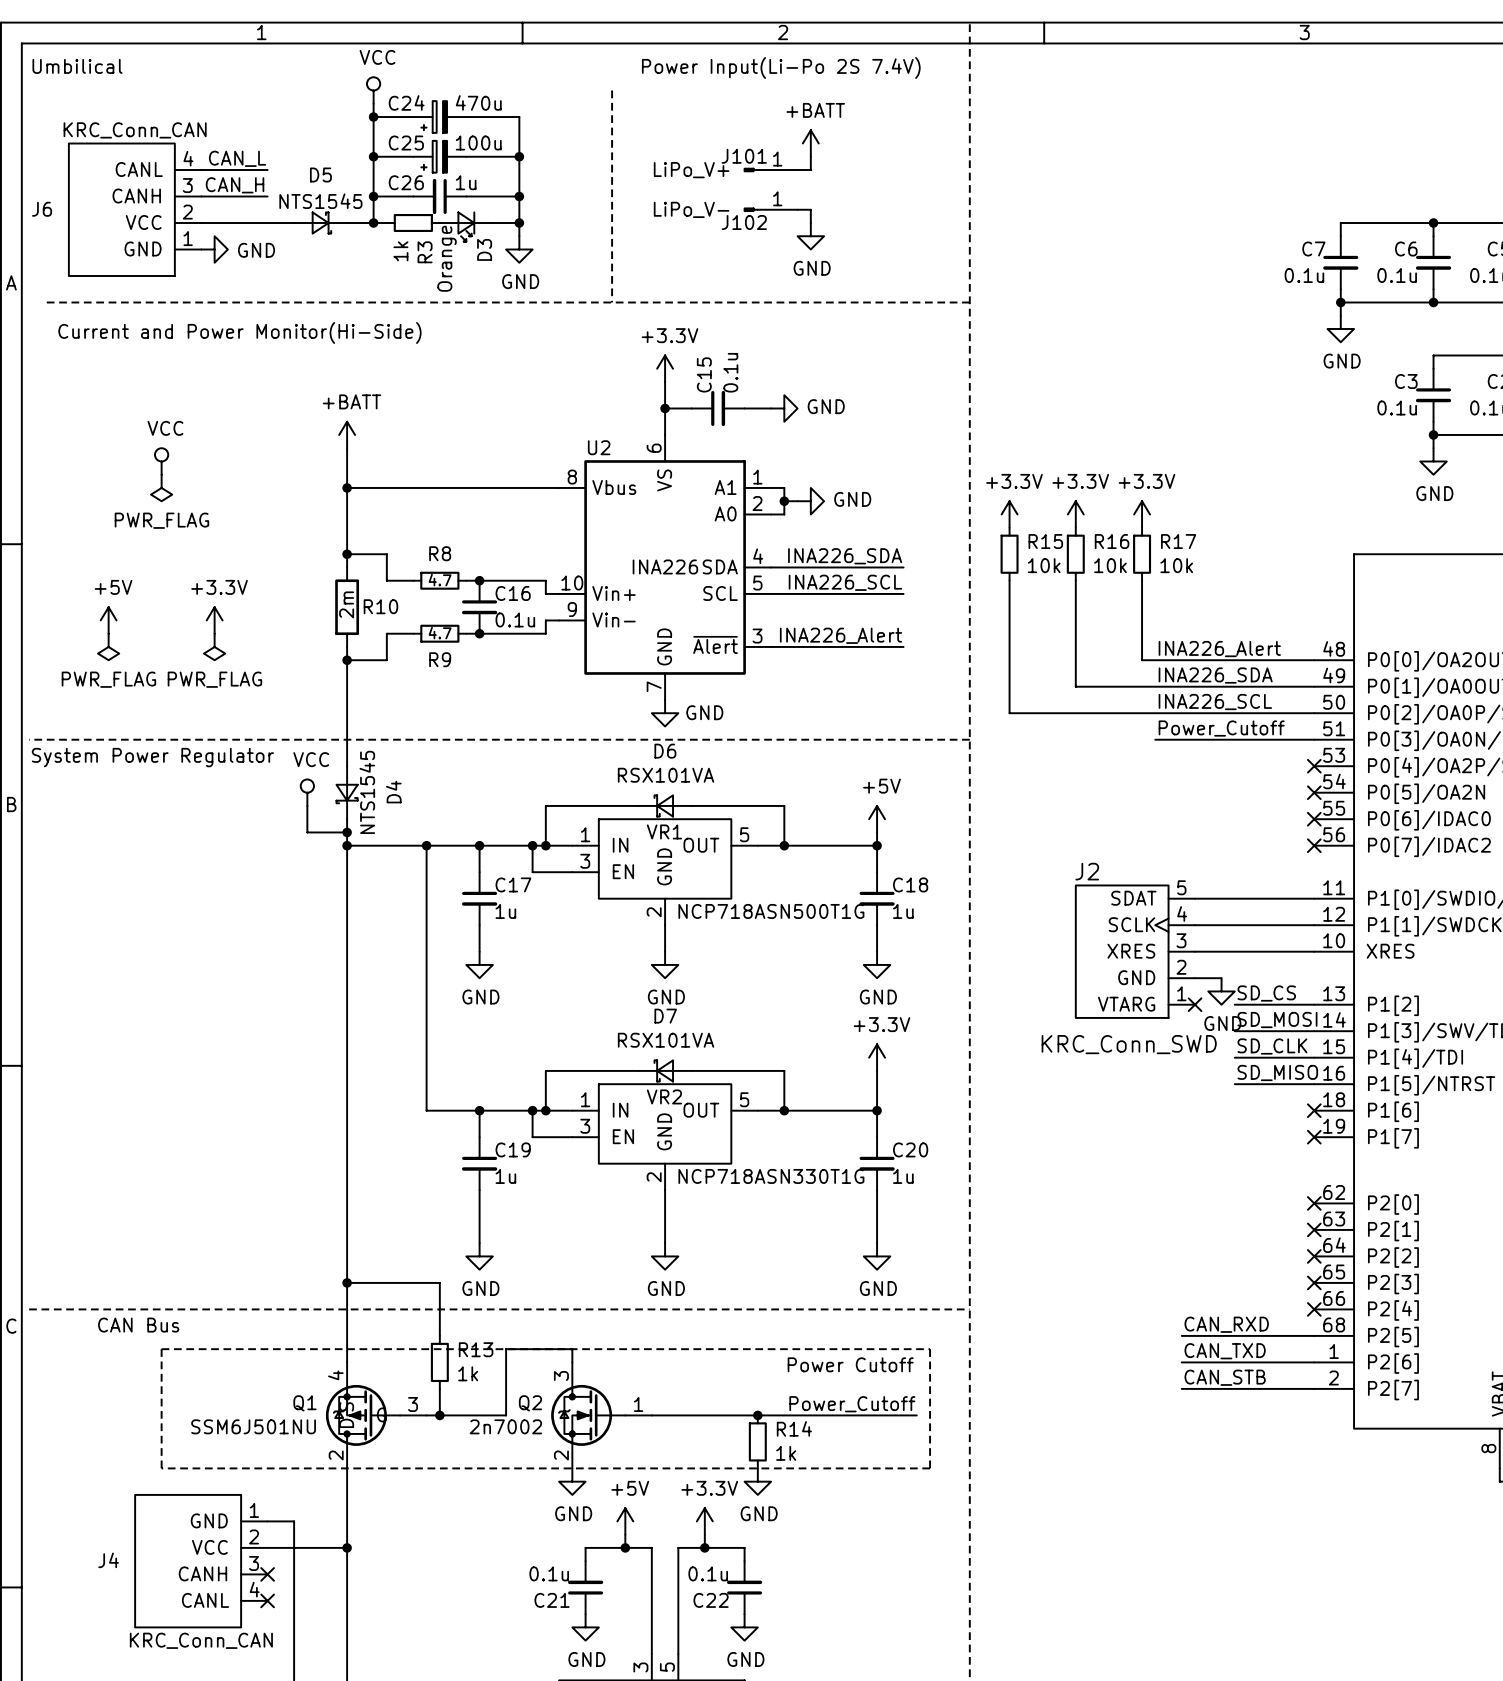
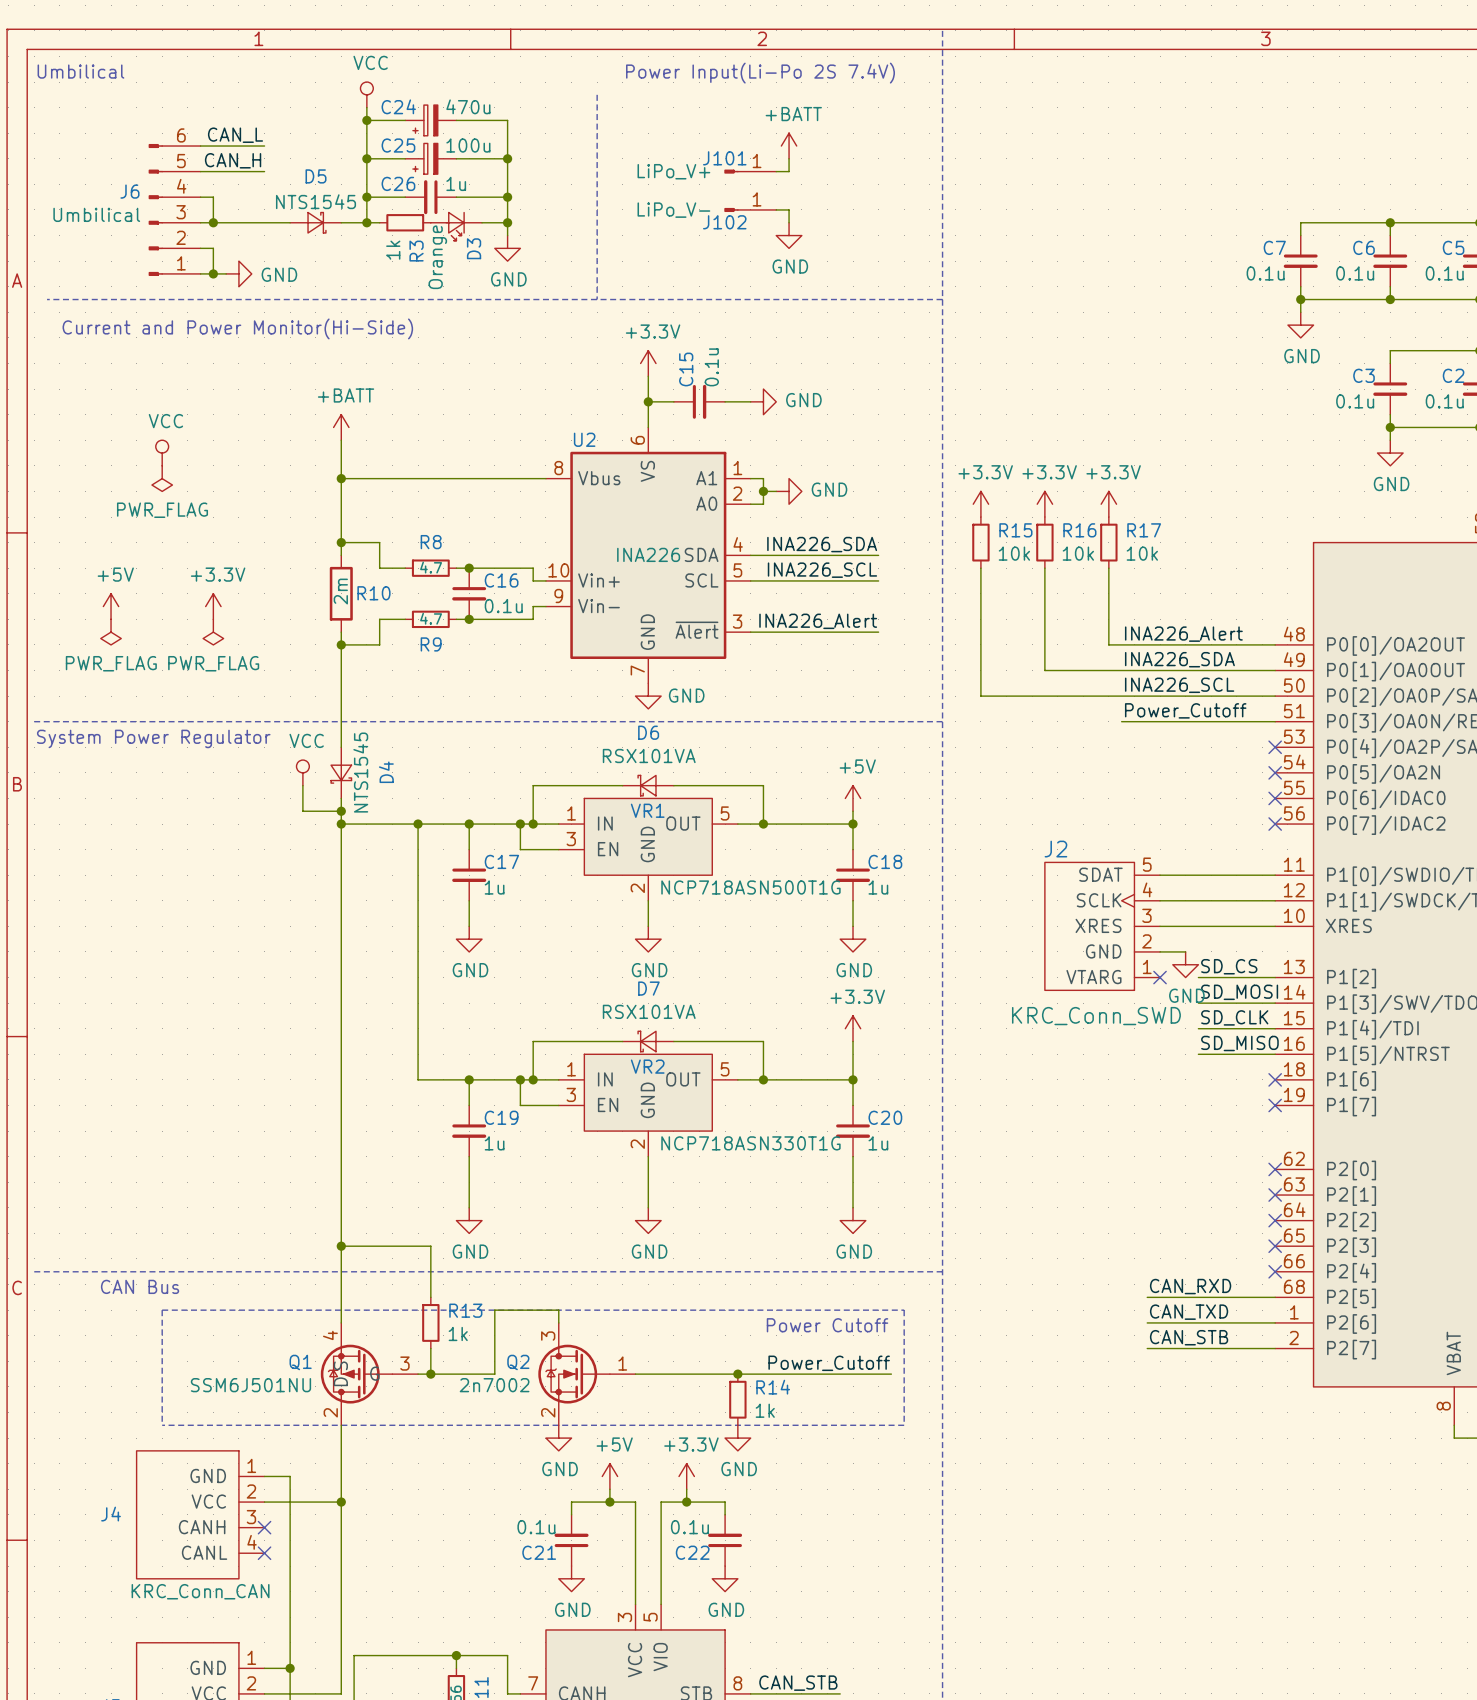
J6 value: KRC_Conn_CAN (135, 130) -> Umbilical (96, 214)
label: none -> CAN_L (235, 135)
J6 symbol: [68, 143, 202, 276] -> [148, 143, 201, 276]
wire: none -> (200, 146) (264, 146)
label: CAN_L (237, 158) -> CAN_H (233, 160)
label: CAN_H (235, 185) -> none
wire: (214, 196) (267, 196) -> (213, 197) (213, 222)
J6 name position: J6 (42, 209) -> J6 (129, 191)
junction: none -> (213, 222)
power symbol position: GND (214, 249) -> GND (238, 273)
wire: none -> (200, 273) (226, 273)
junction: none -> (213, 273)

